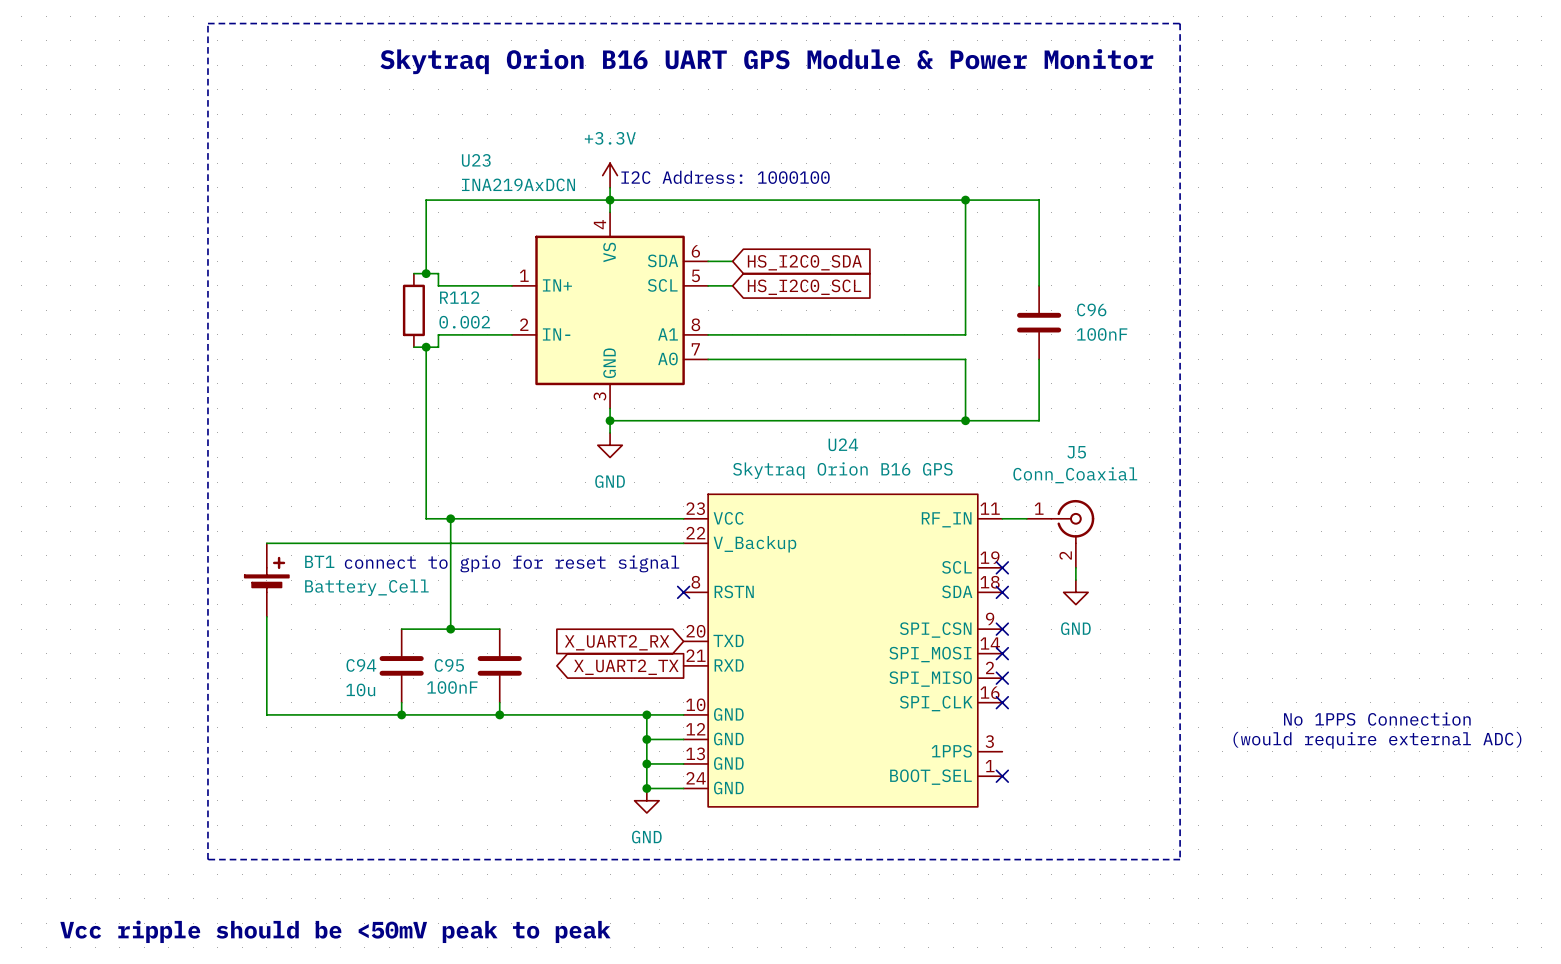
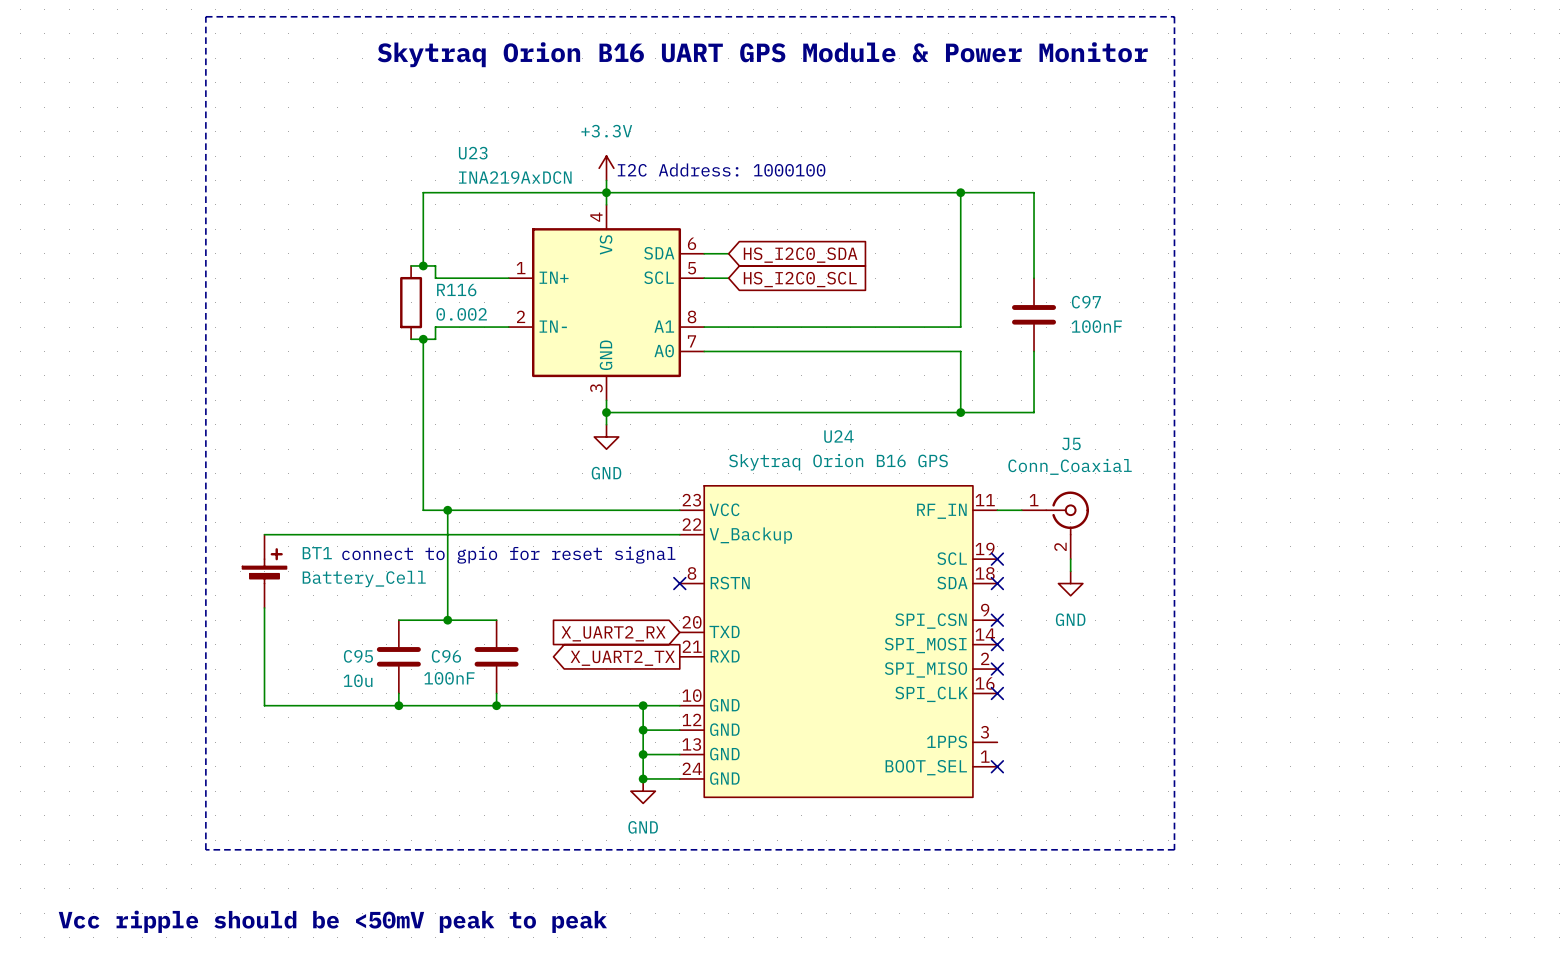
R112 name: R112 (459, 297) -> R116 (456, 290)
C96 name: C96 (1091, 309) -> C97 (1086, 302)
C94 name: C94 (361, 665) -> C95 (358, 656)
C95 name: C95 (449, 665) -> C96 (446, 656)
text: No 1PPS Connection (1377, 719) -> none
text: (would require external ADC) (1377, 740) -> none

